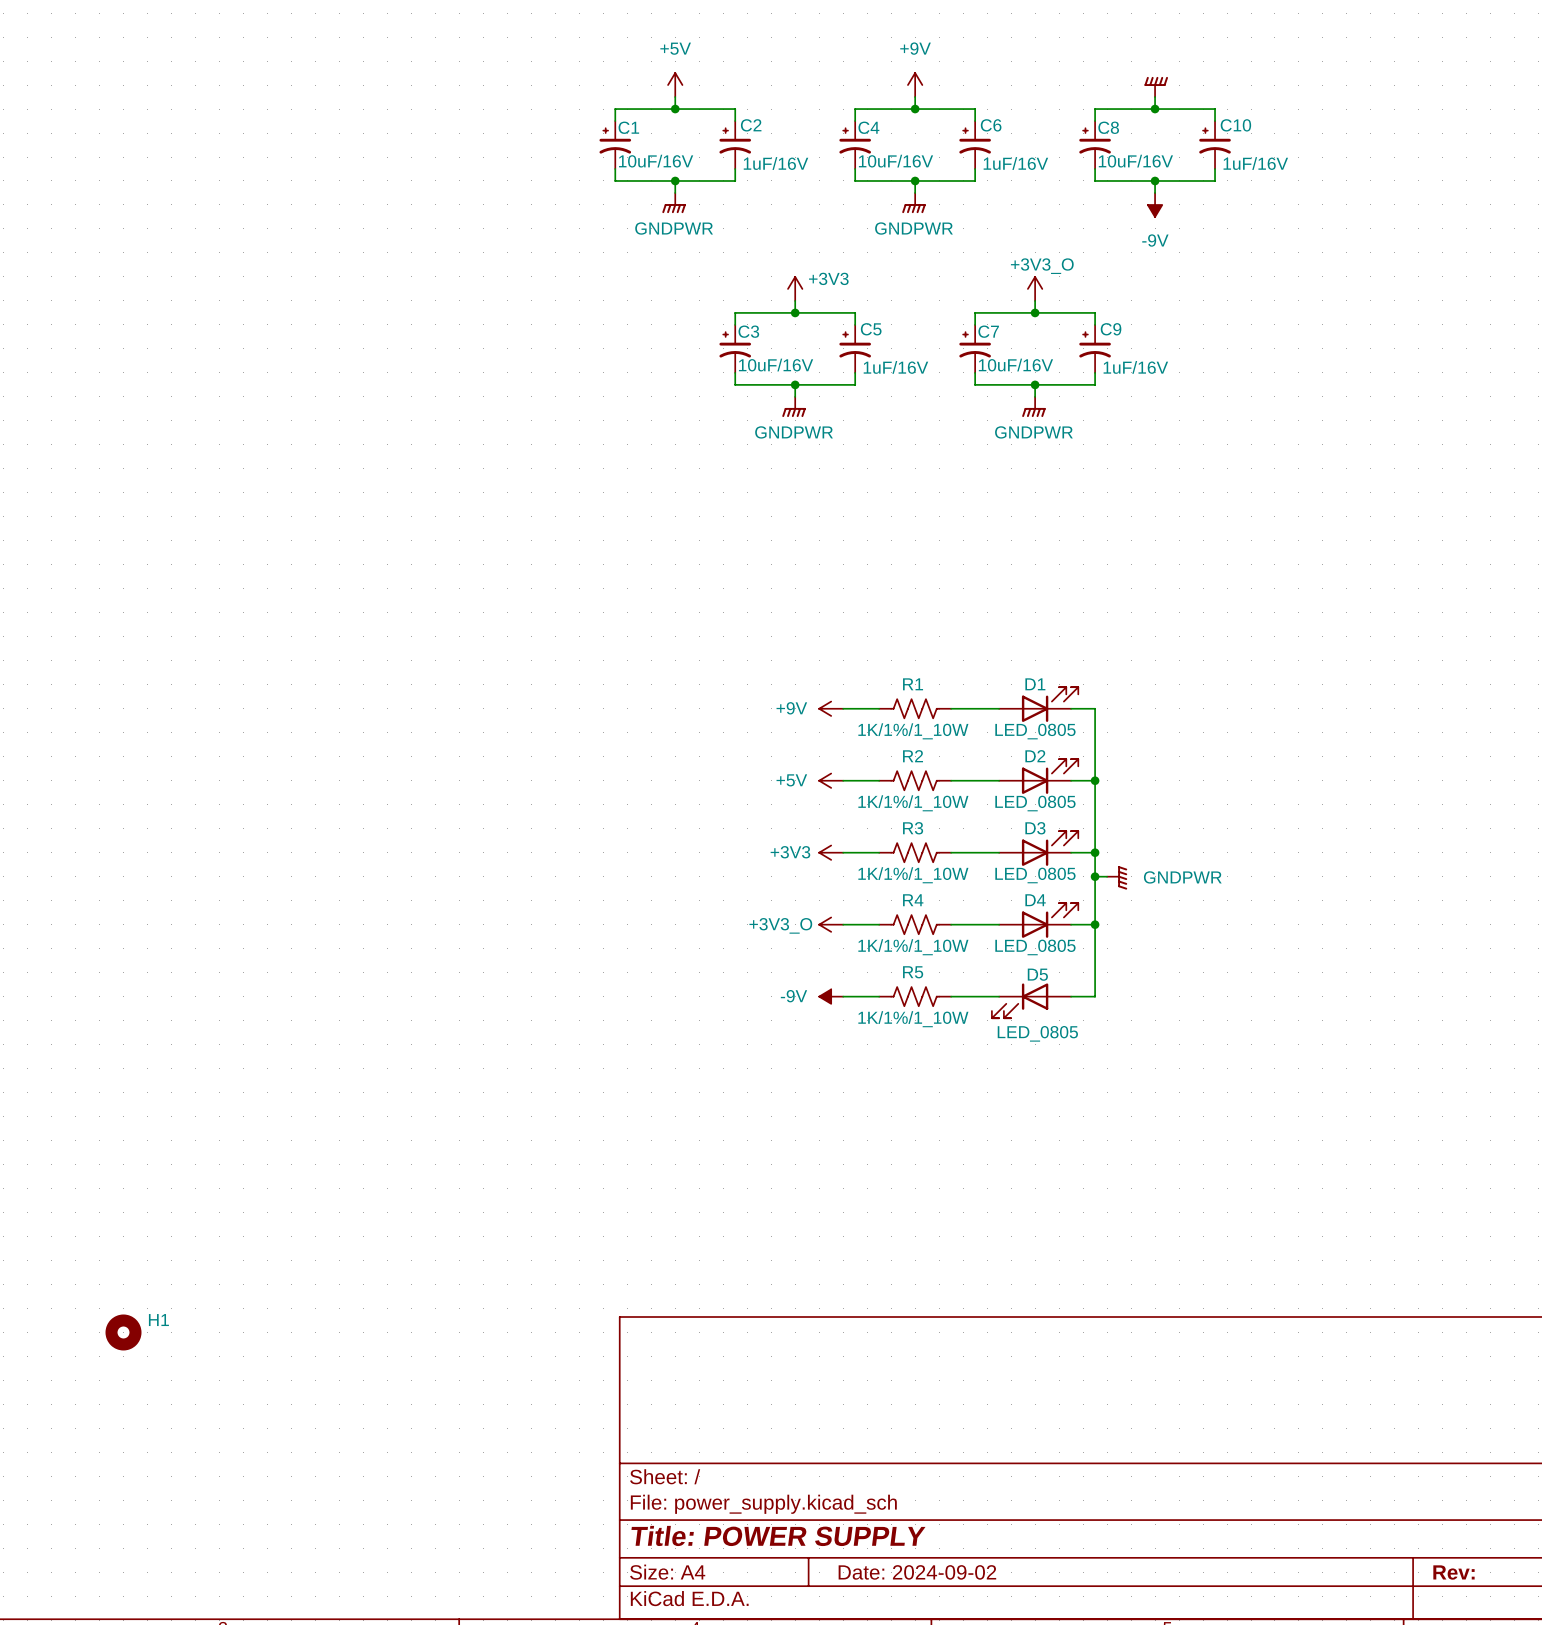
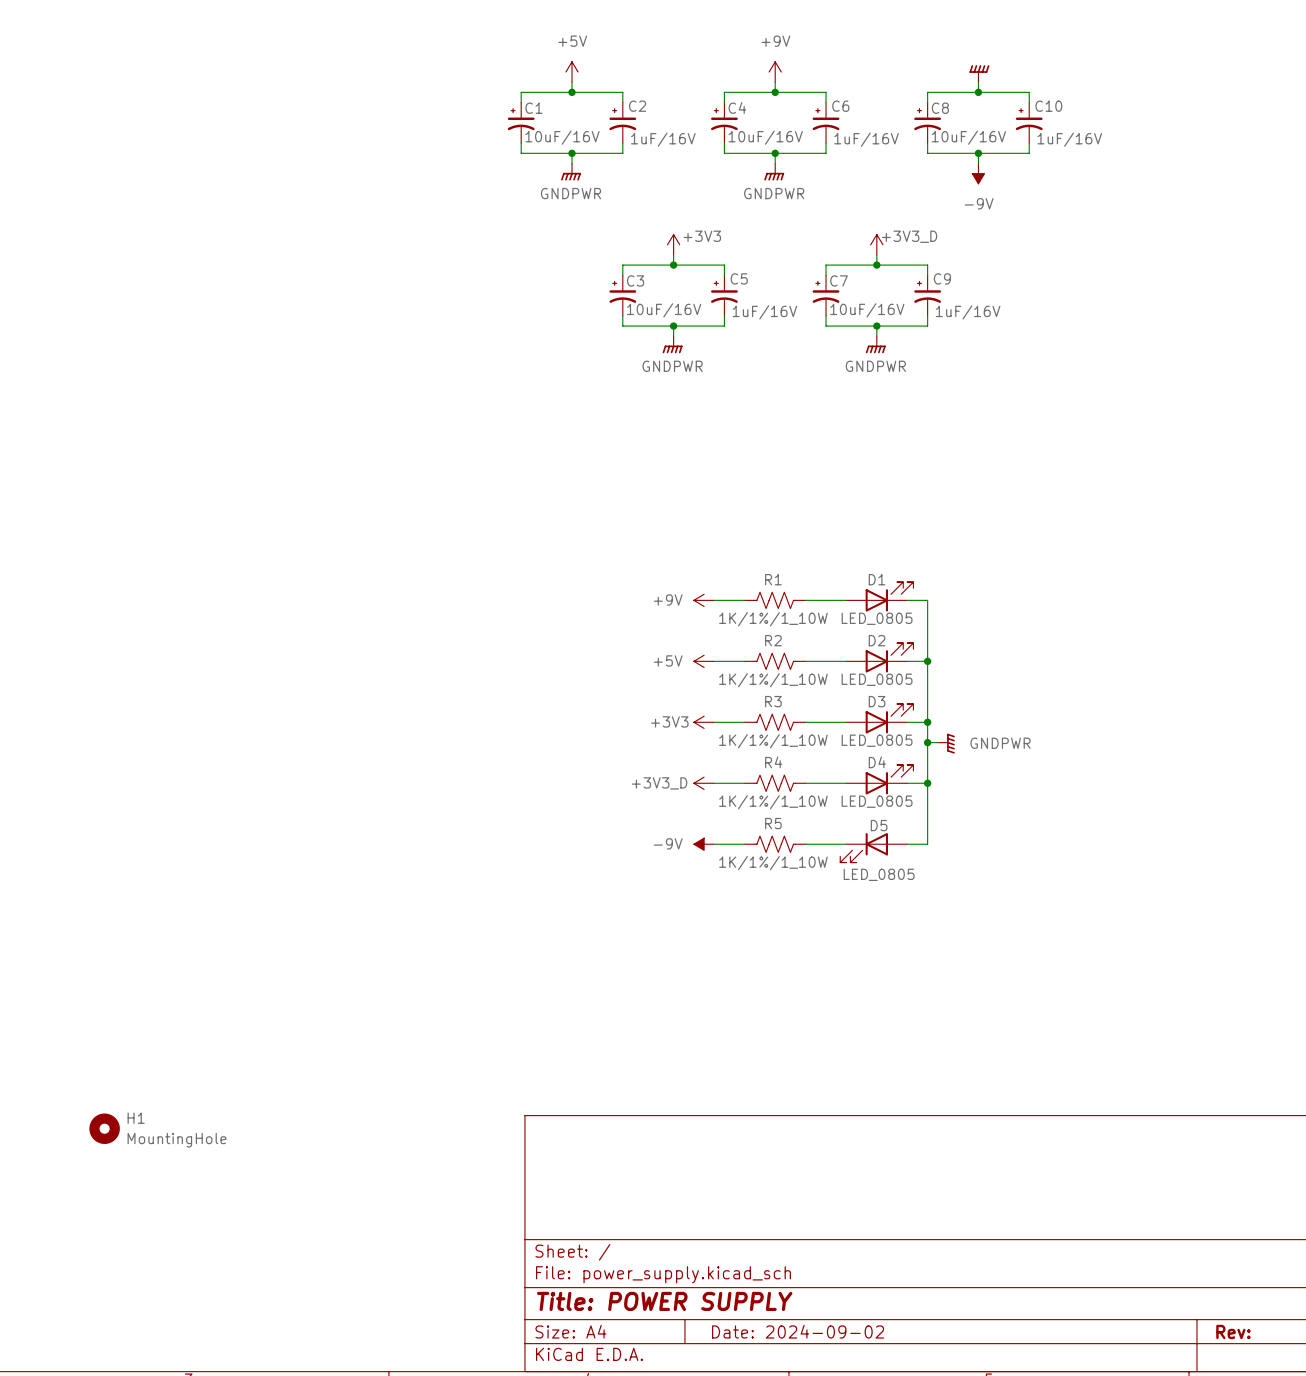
power symbol: +3V3_O (1035, 288) -> +3V3_D (876, 244)
power symbol: +3V3_O (831, 924) -> +3V3_D (704, 783)
H1 value: none -> MountingHole (177, 1140)

